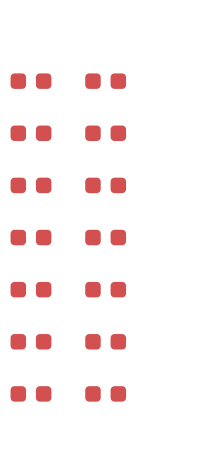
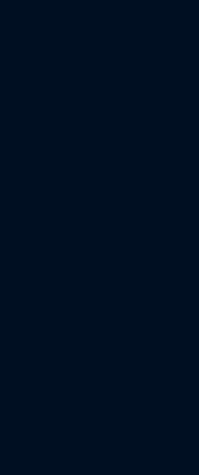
part: (30, 81) -> none
part: (105, 81) -> none
part: (30, 133) -> none
part: (105, 133) -> none
part: (30, 185) -> none
part: (105, 185) -> none
part: (30, 237) -> none
part: (105, 237) -> none
part: (30, 289) -> none
part: (105, 289) -> none
part: (30, 341) -> none
part: (105, 341) -> none
part: (30, 393) -> none
part: (105, 393) -> none

